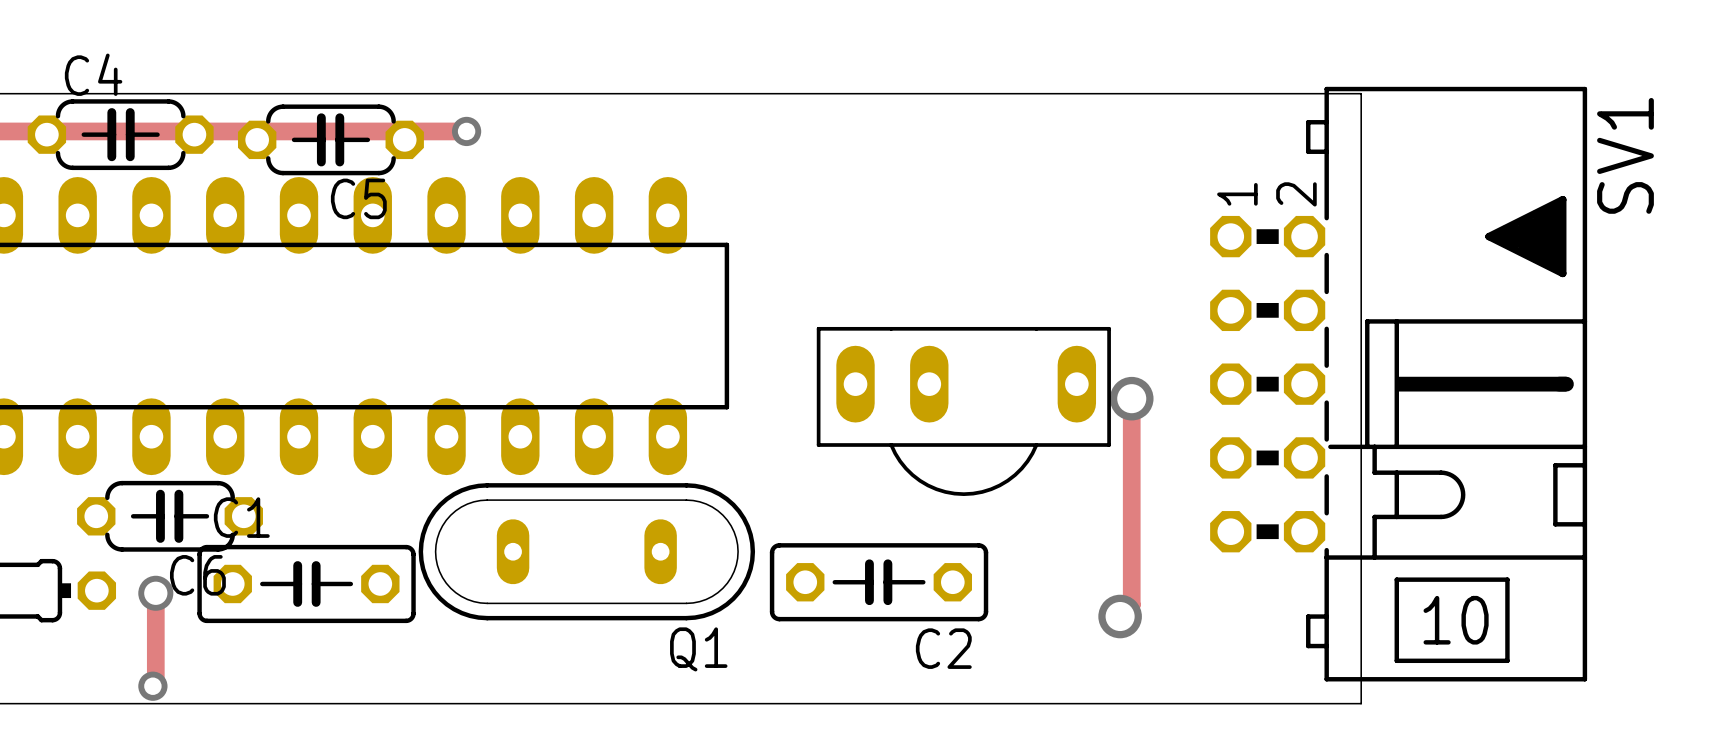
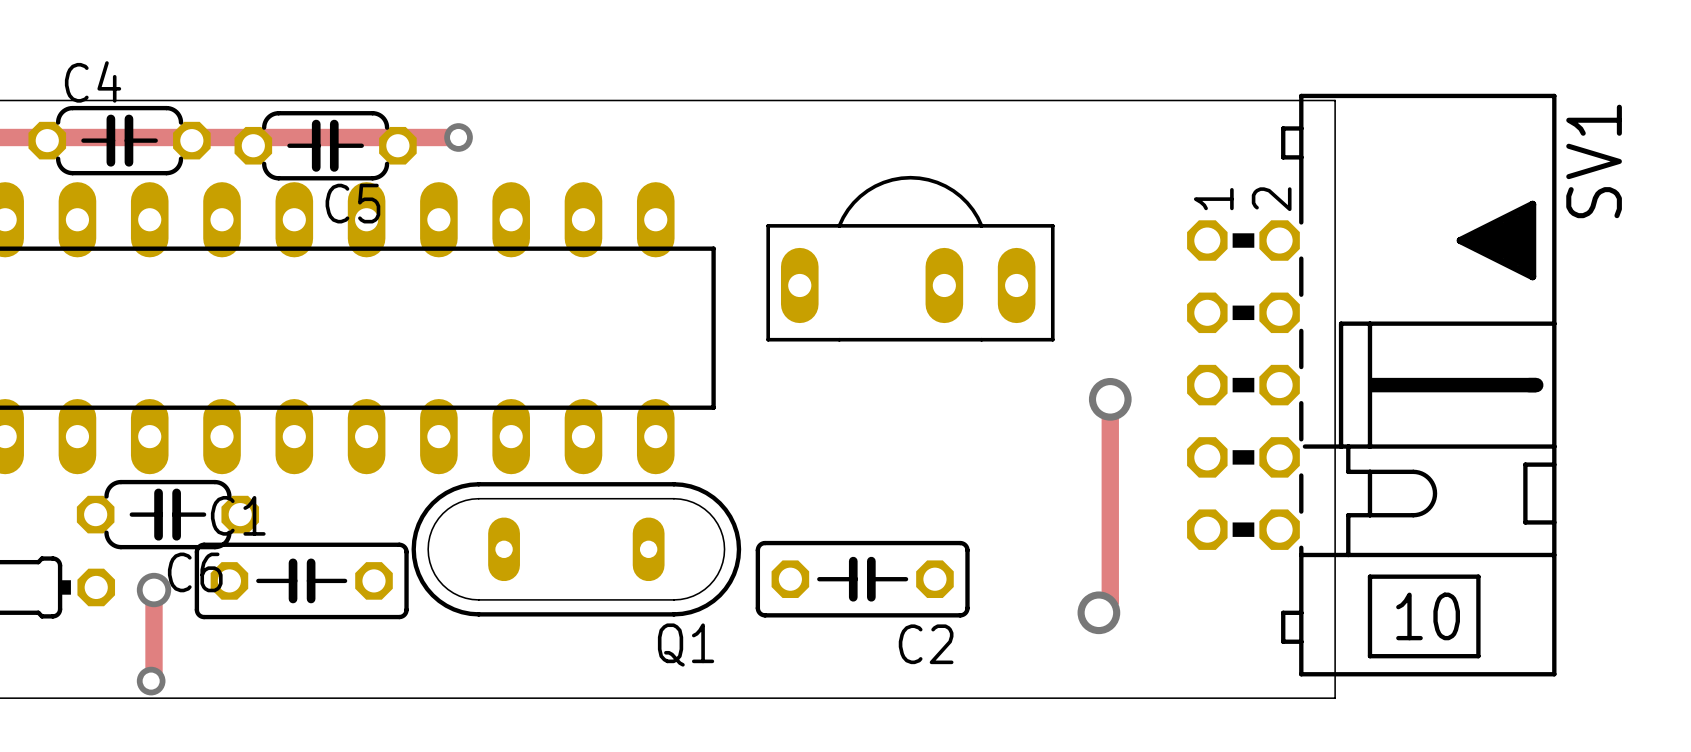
part rotation: 0° (963, 411) -> 180° (910, 258)

